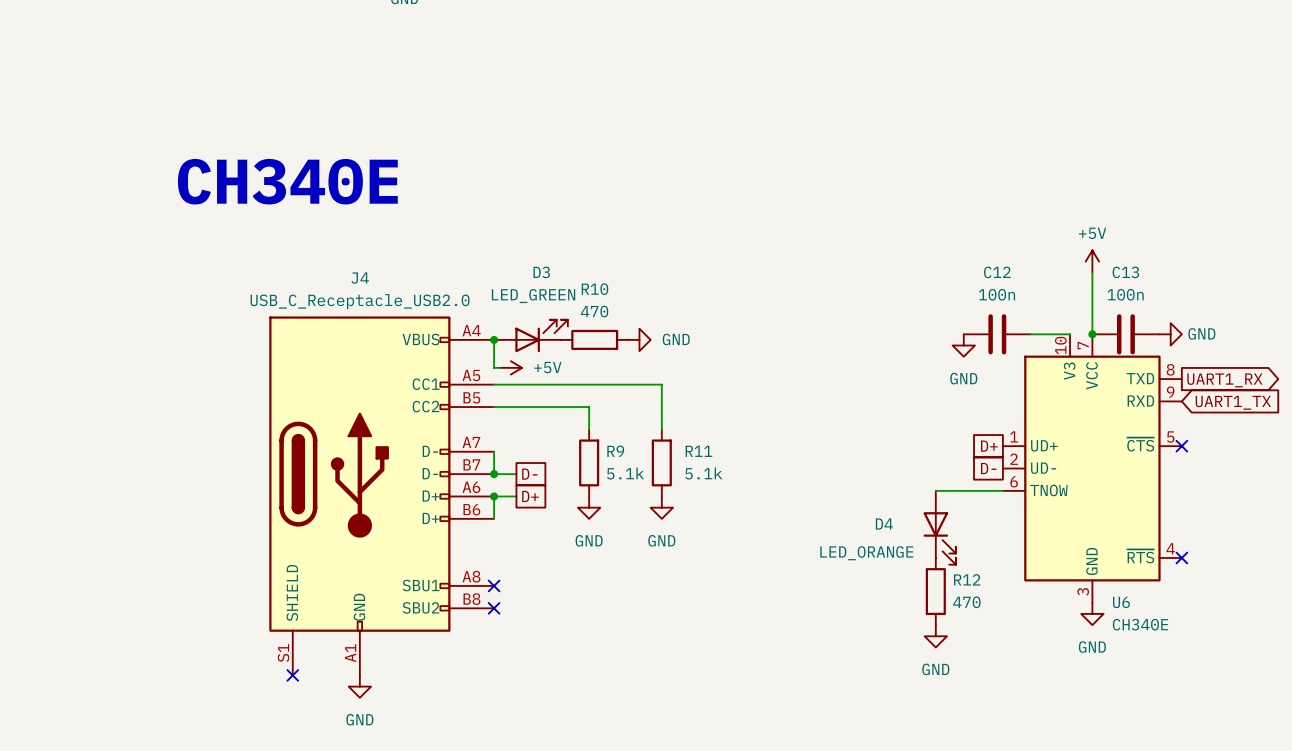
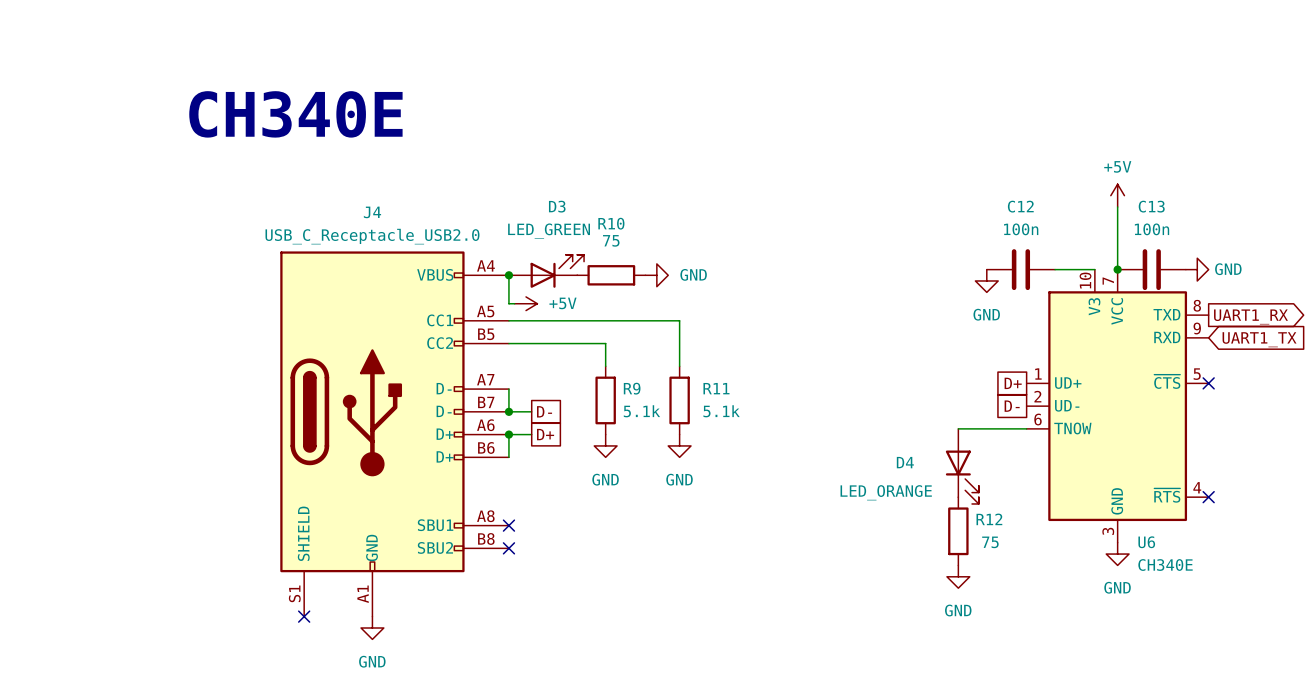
R10 value: 470 (594, 311) -> 75 (611, 240)
R12 value: 470 (966, 602) -> 75 (990, 542)

